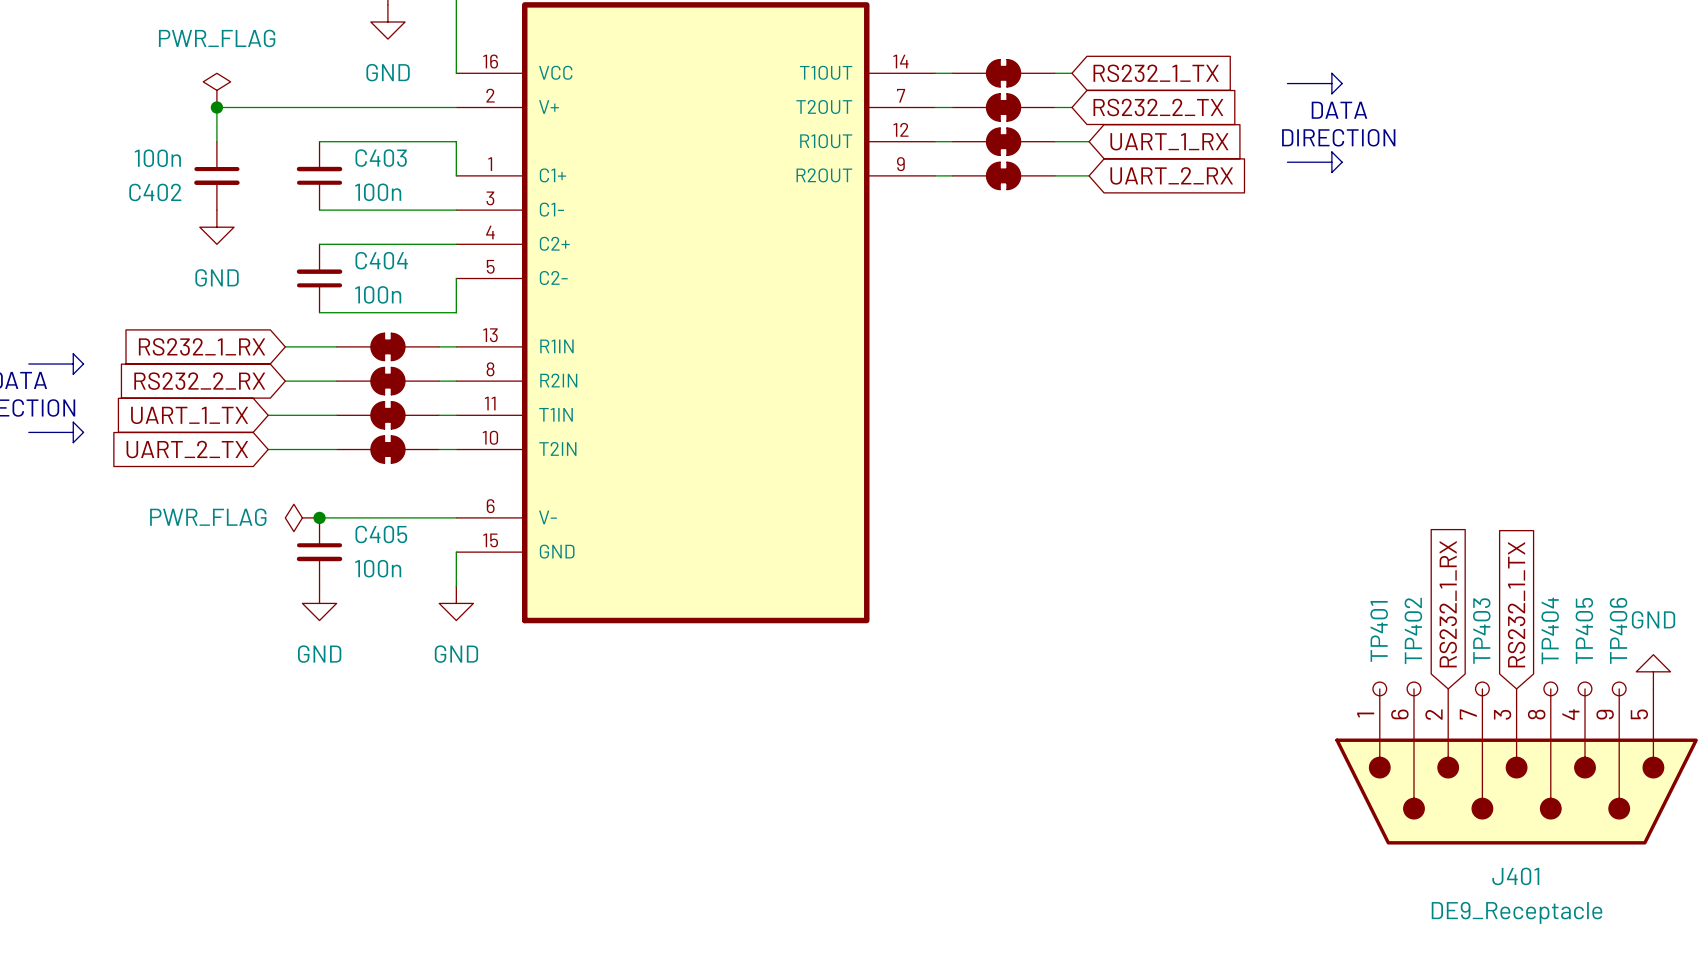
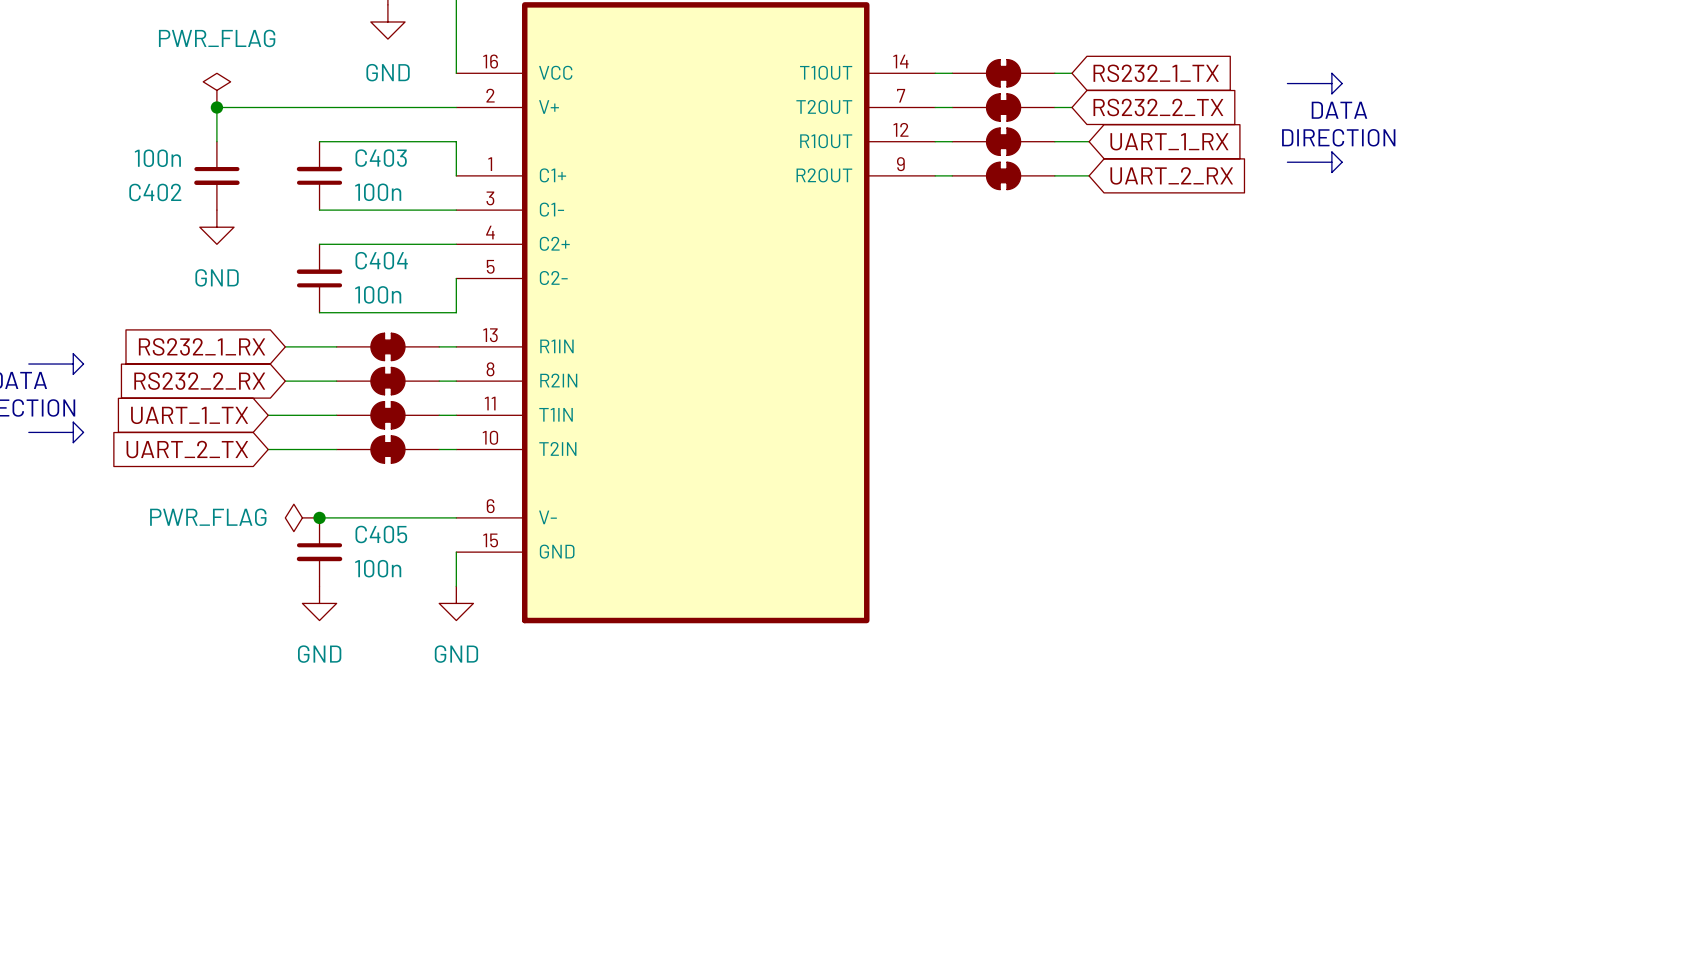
global label: RS232_1_RX (1448, 604) -> none
global label: RS232_1_TX (1516, 604) -> none
power symbol: GND (1653, 671) -> none
TP401: (1379, 688) -> none
TP402: (1413, 688) -> none
TP403: (1482, 688) -> none
TP404: (1550, 688) -> none
TP405: (1585, 688) -> none
TP406: (1619, 688) -> none
J401: DE9_Receptacle (1516, 766) -> none

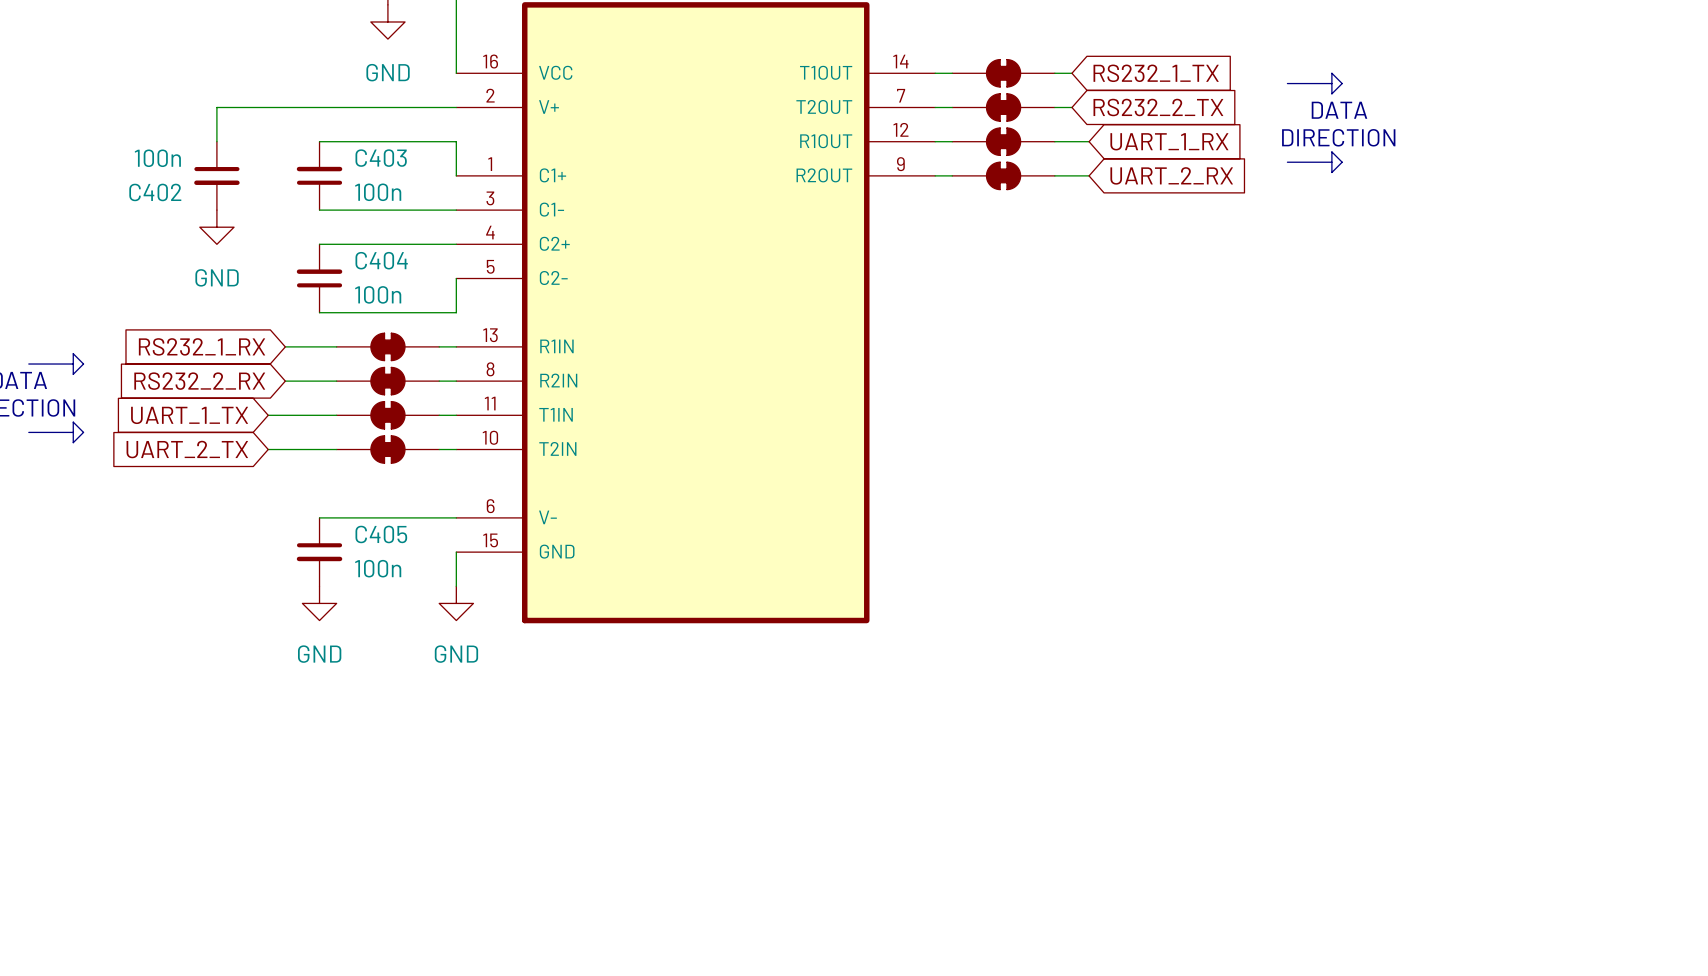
power symbol: PWR_FLAG (216, 90) -> none
junction: (216, 107) -> none
power symbol: PWR_FLAG (302, 517) -> none
junction: (319, 517) -> none

